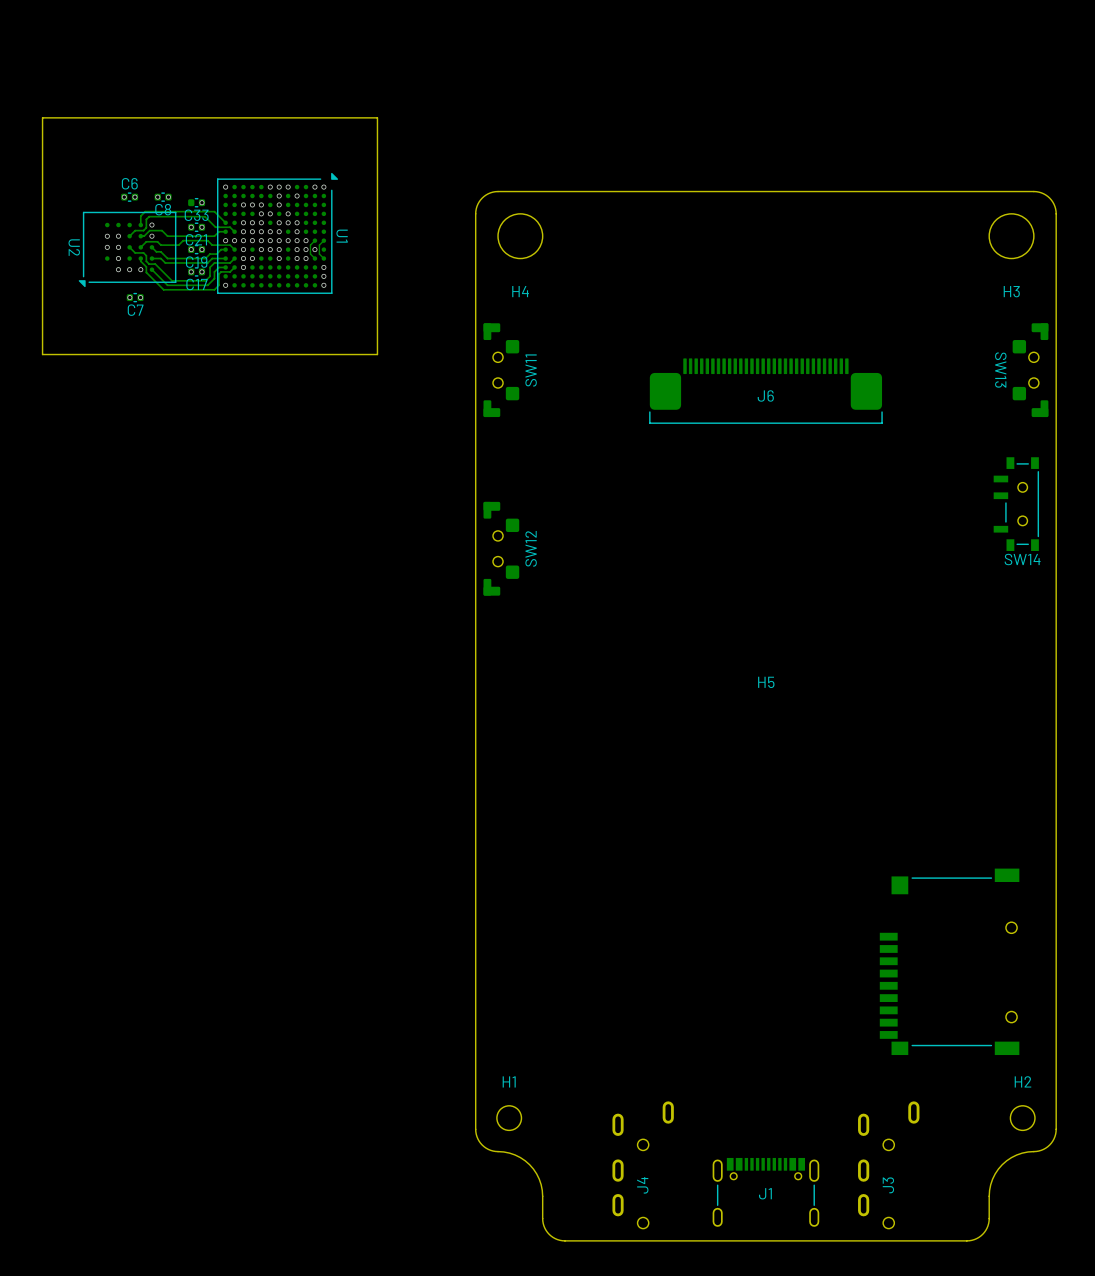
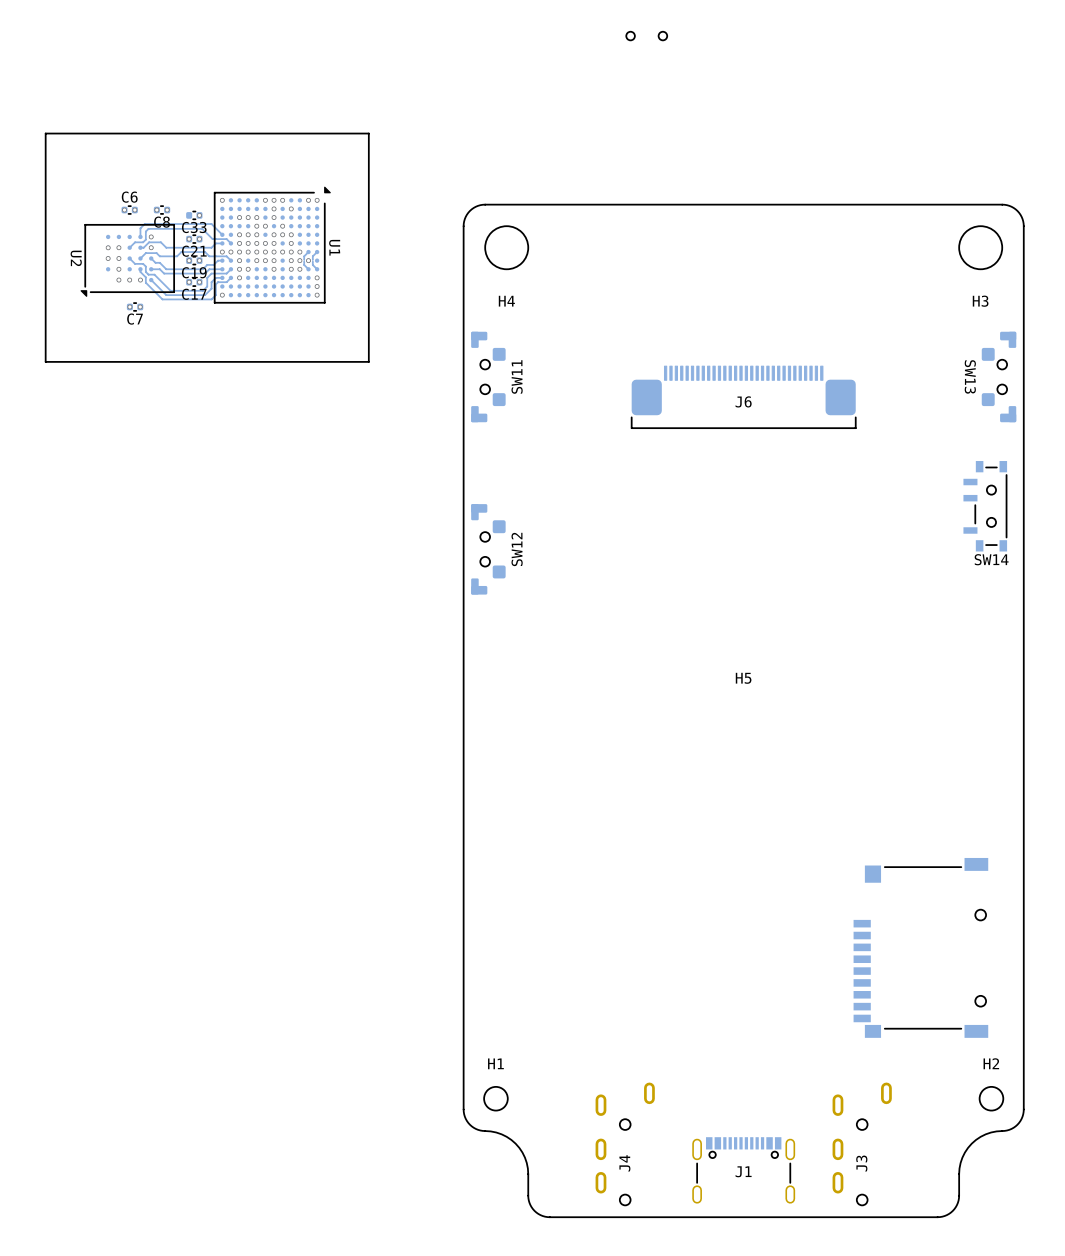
part: none -> (646, 36)

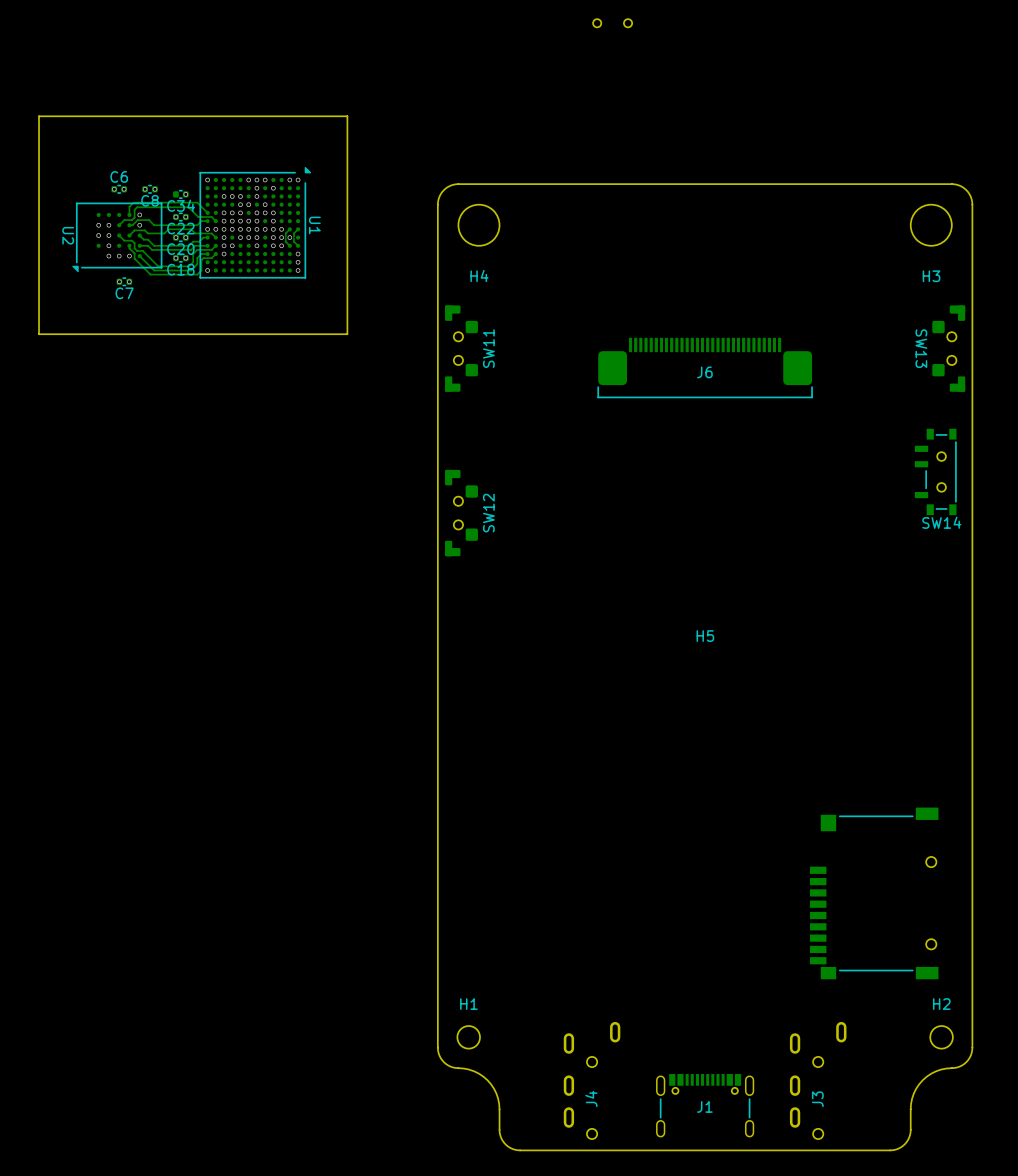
C33 name: C33 (194, 227) -> C34 (181, 205)
C21 name: C21 (194, 251) -> C22 (180, 228)
C19 name: C19 (194, 272) -> C20 (180, 249)
C17 name: C17 (194, 294) -> C18 (180, 269)

